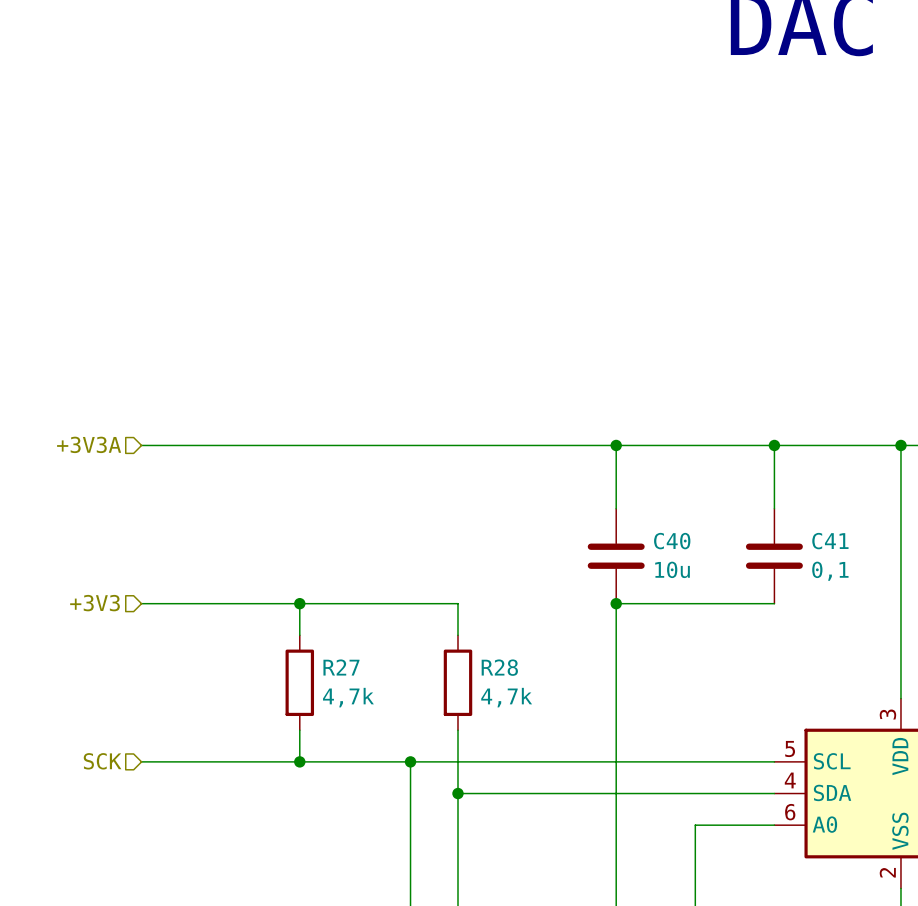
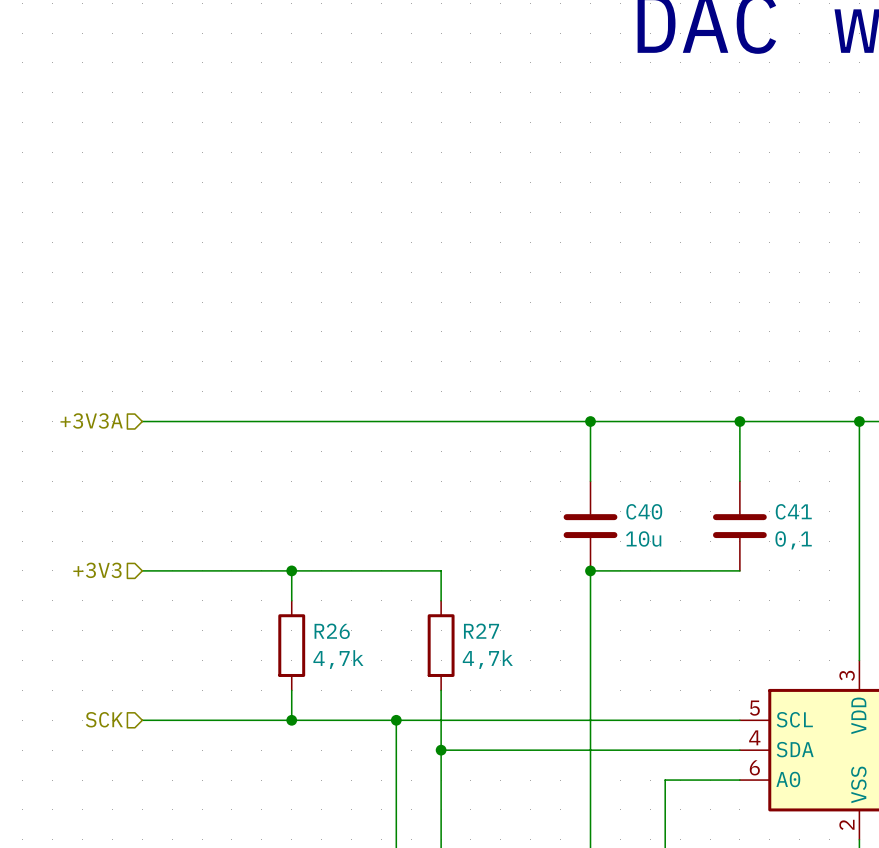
R27 name: R27 (341, 667) -> R26 (332, 631)
R28 name: R28 (499, 667) -> R27 (481, 631)

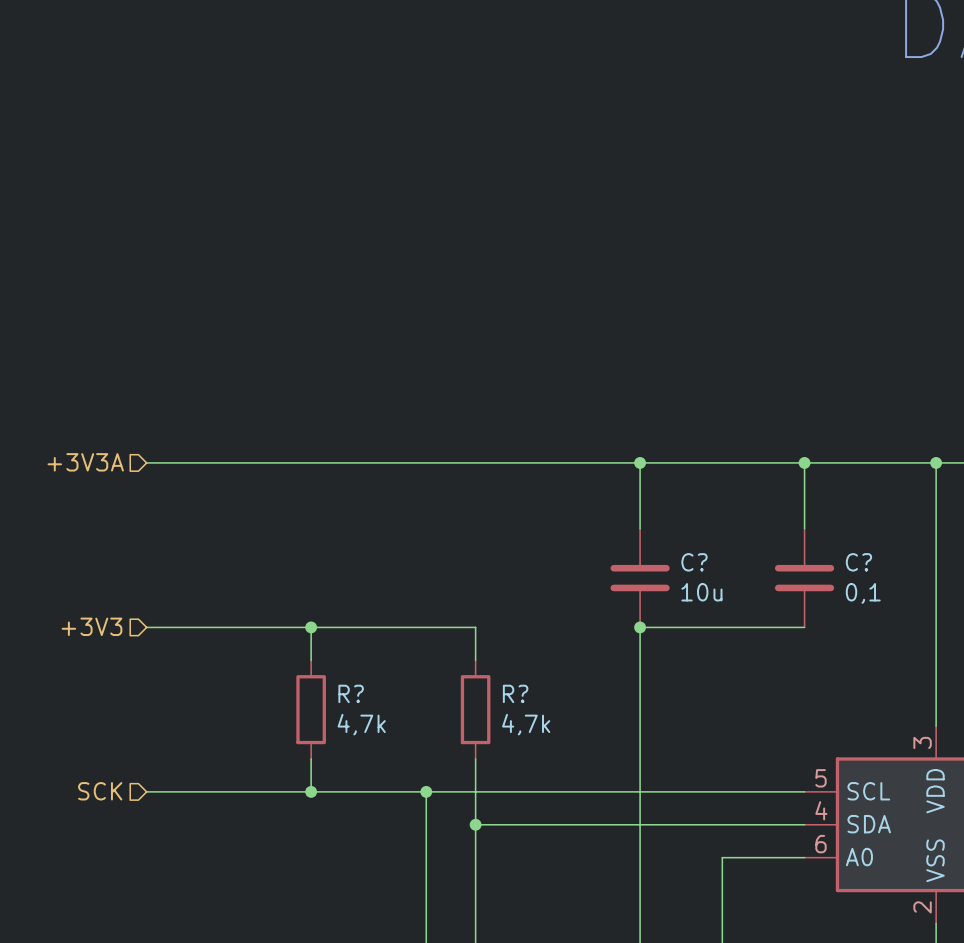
C40 name: C40 (644, 511) -> C? (694, 562)
C41 name: C41 (793, 511) -> C? (858, 562)
R26 name: R26 (332, 631) -> R? (351, 693)
R27 name: R27 (481, 631) -> R? (515, 693)

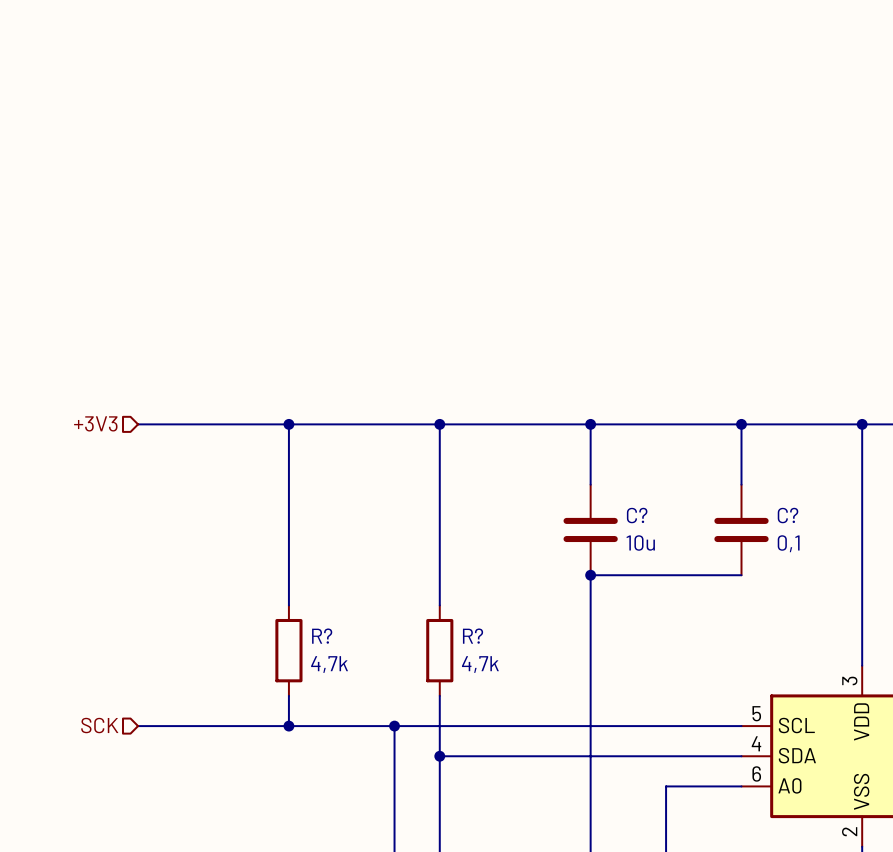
hierarchical label: +3V3A (85, 462) -> +3V3 (95, 423)
wire: none -> (288, 424) (288, 575)
junction: none -> (288, 424)
junction: none -> (439, 424)
hierarchical label: +3V3 (91, 626) -> none
wire: (146, 627) (475, 627) -> (439, 424) (439, 575)
junction: (311, 627) -> none

